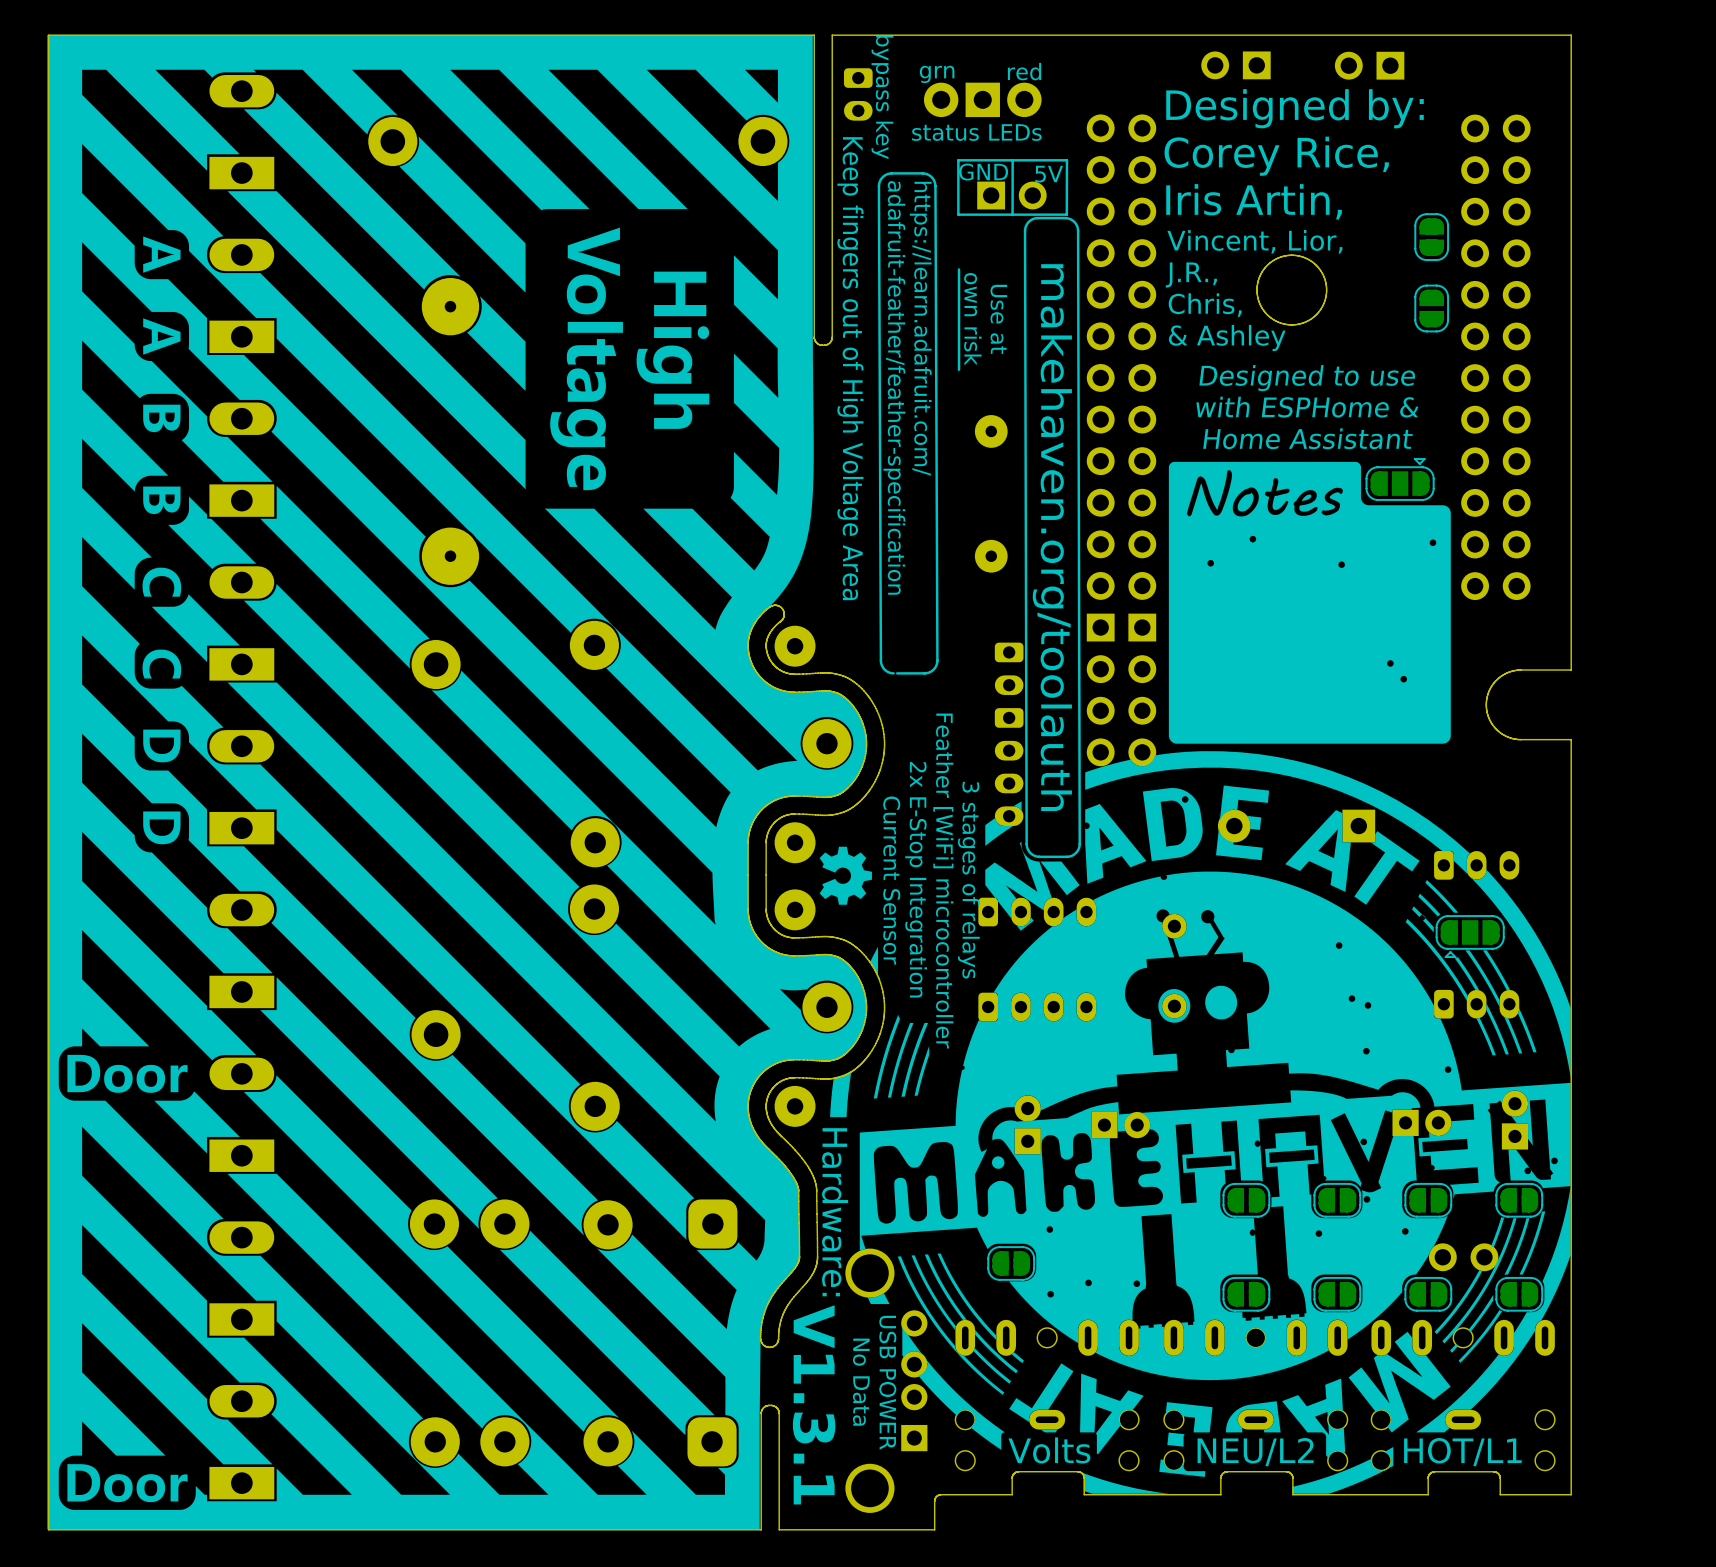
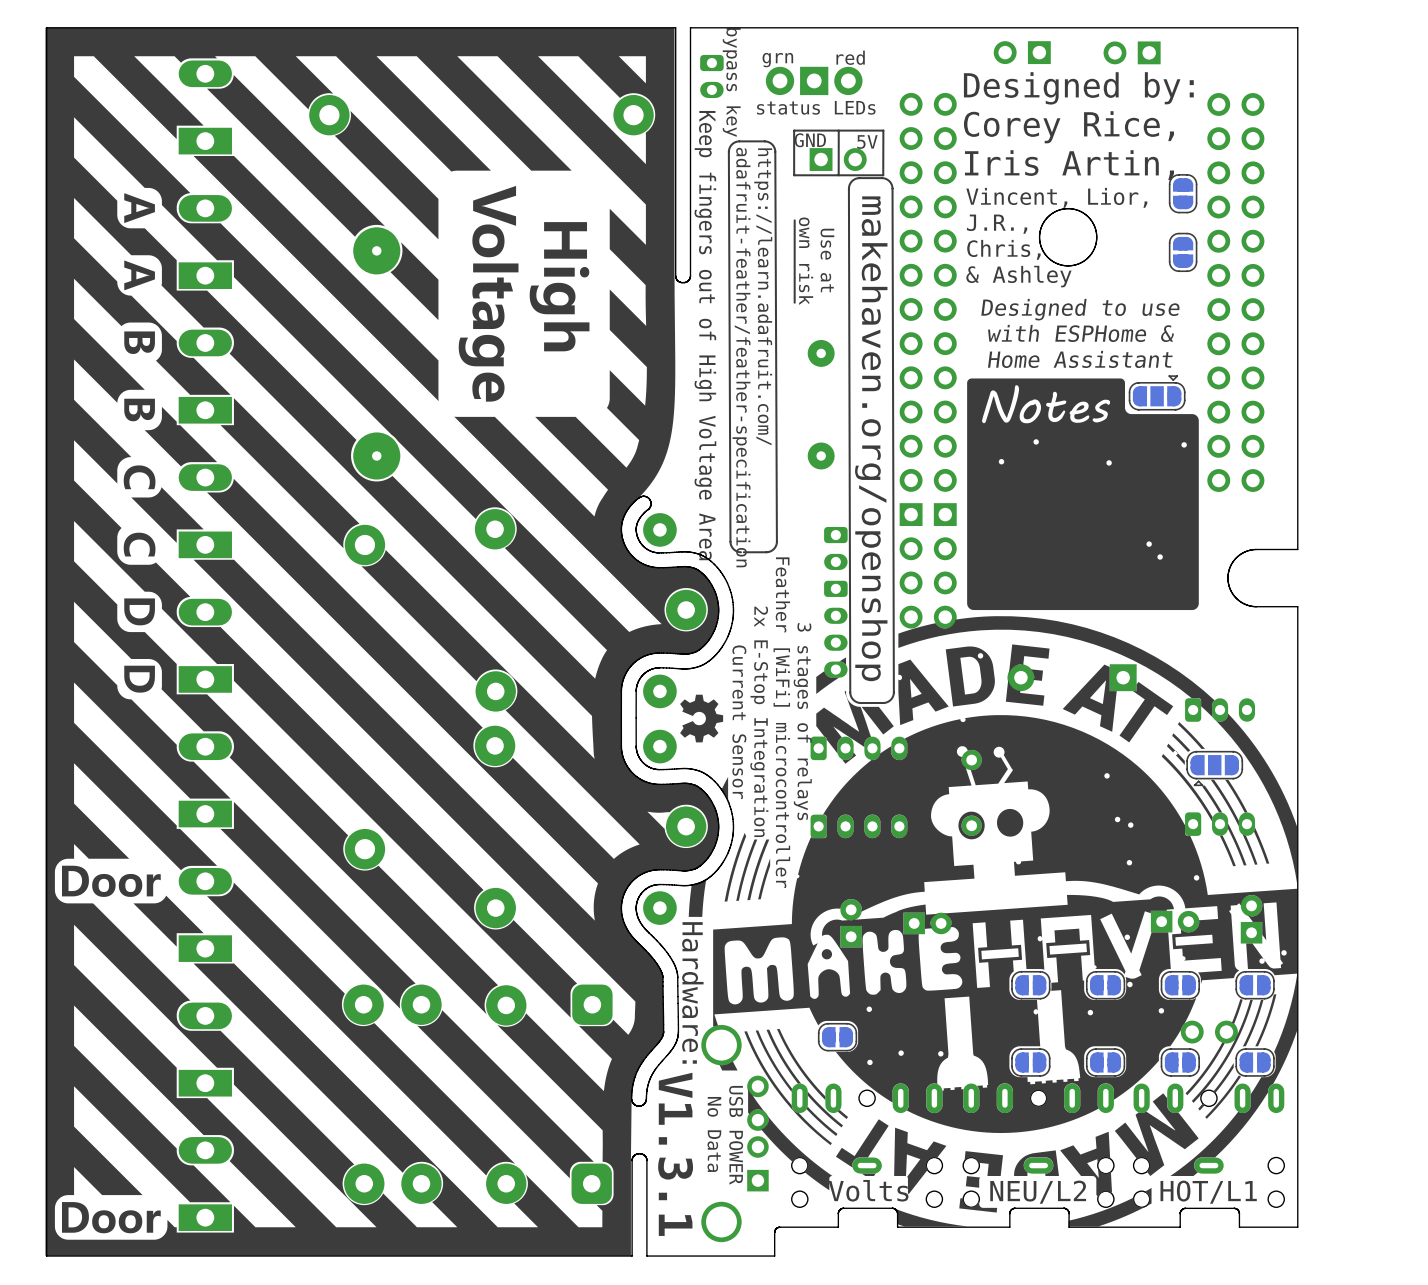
text: makehaven.org/toolauth (1052, 537) -> makehaven.org/openshop (871, 438)

